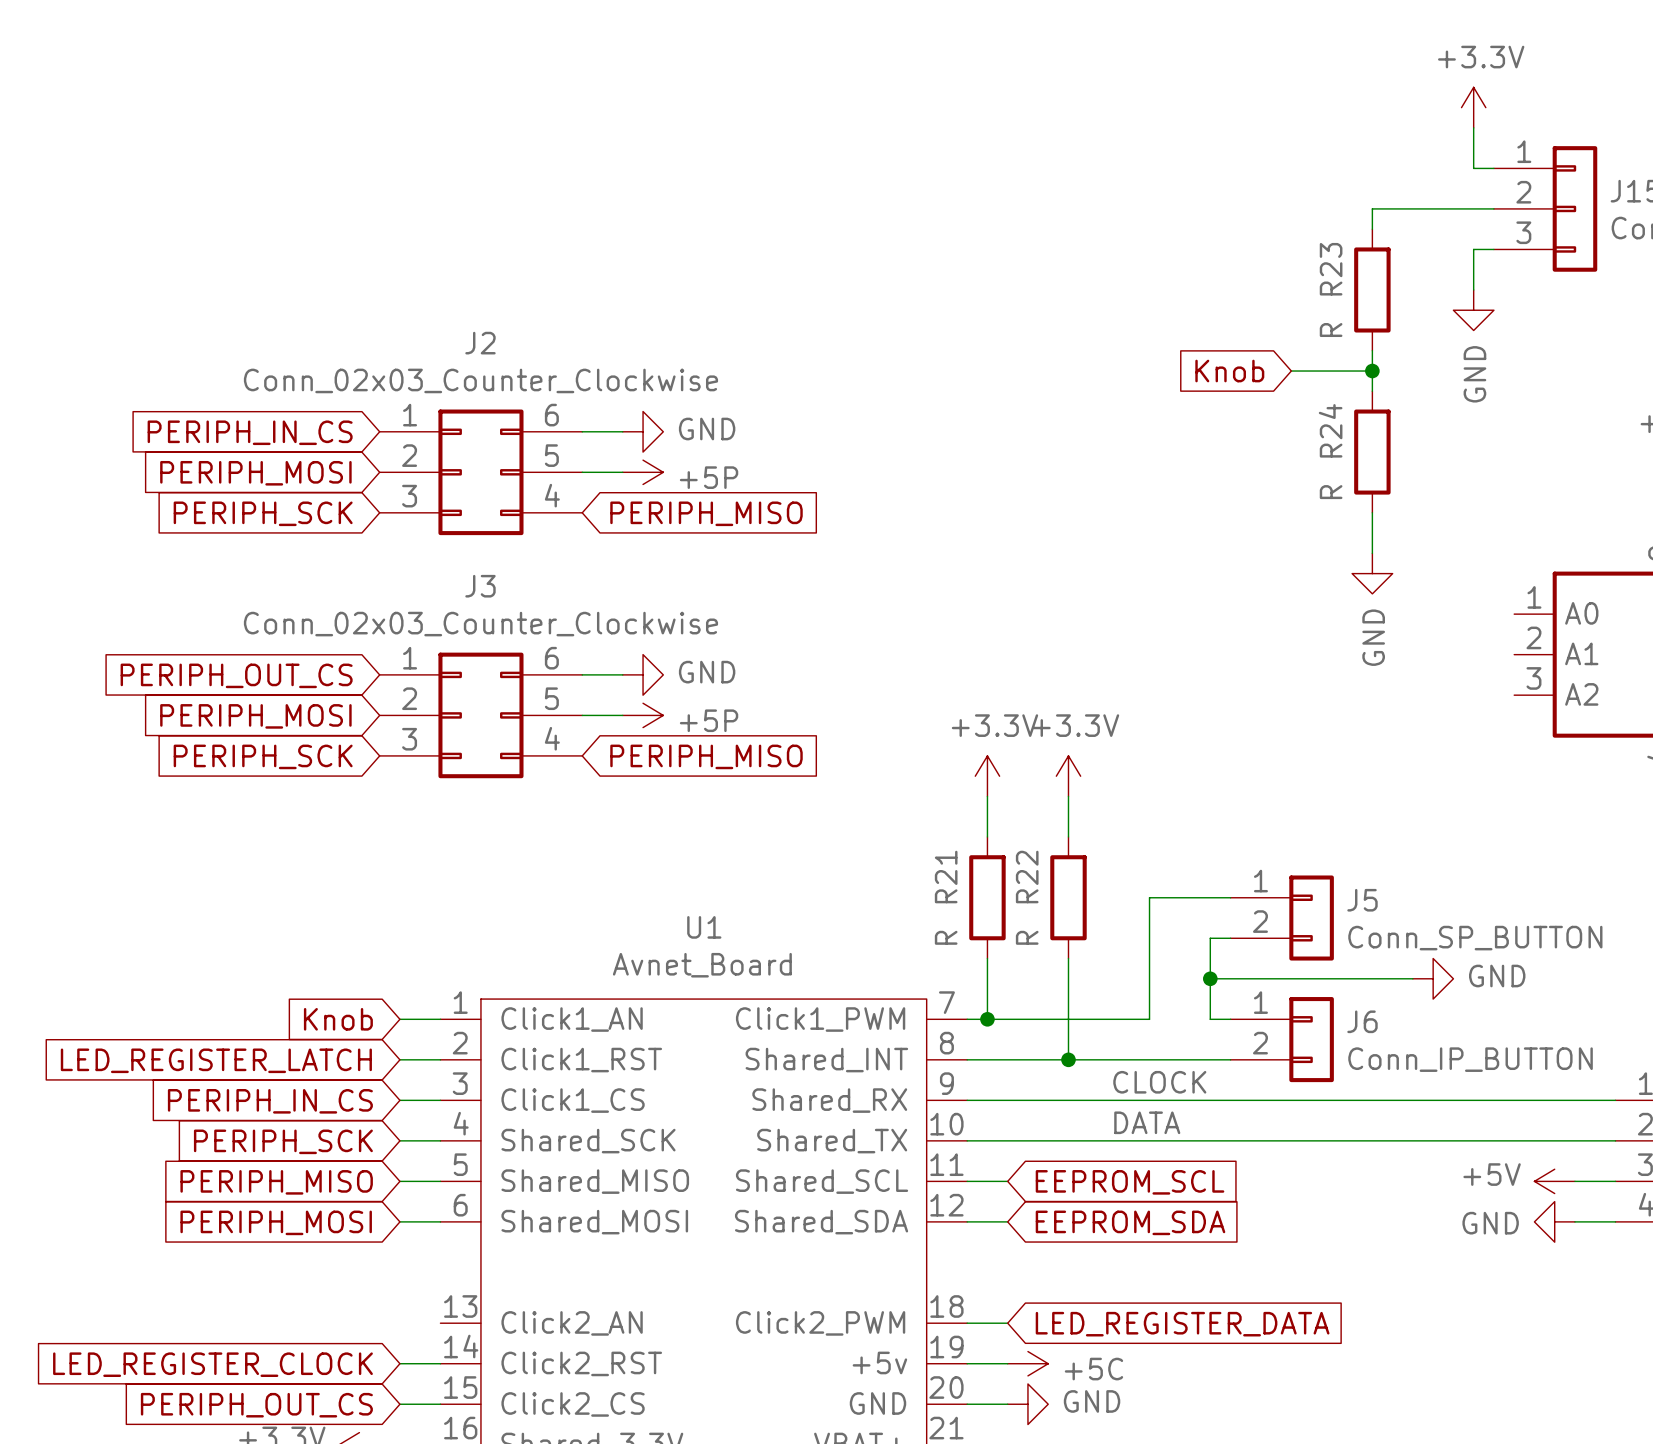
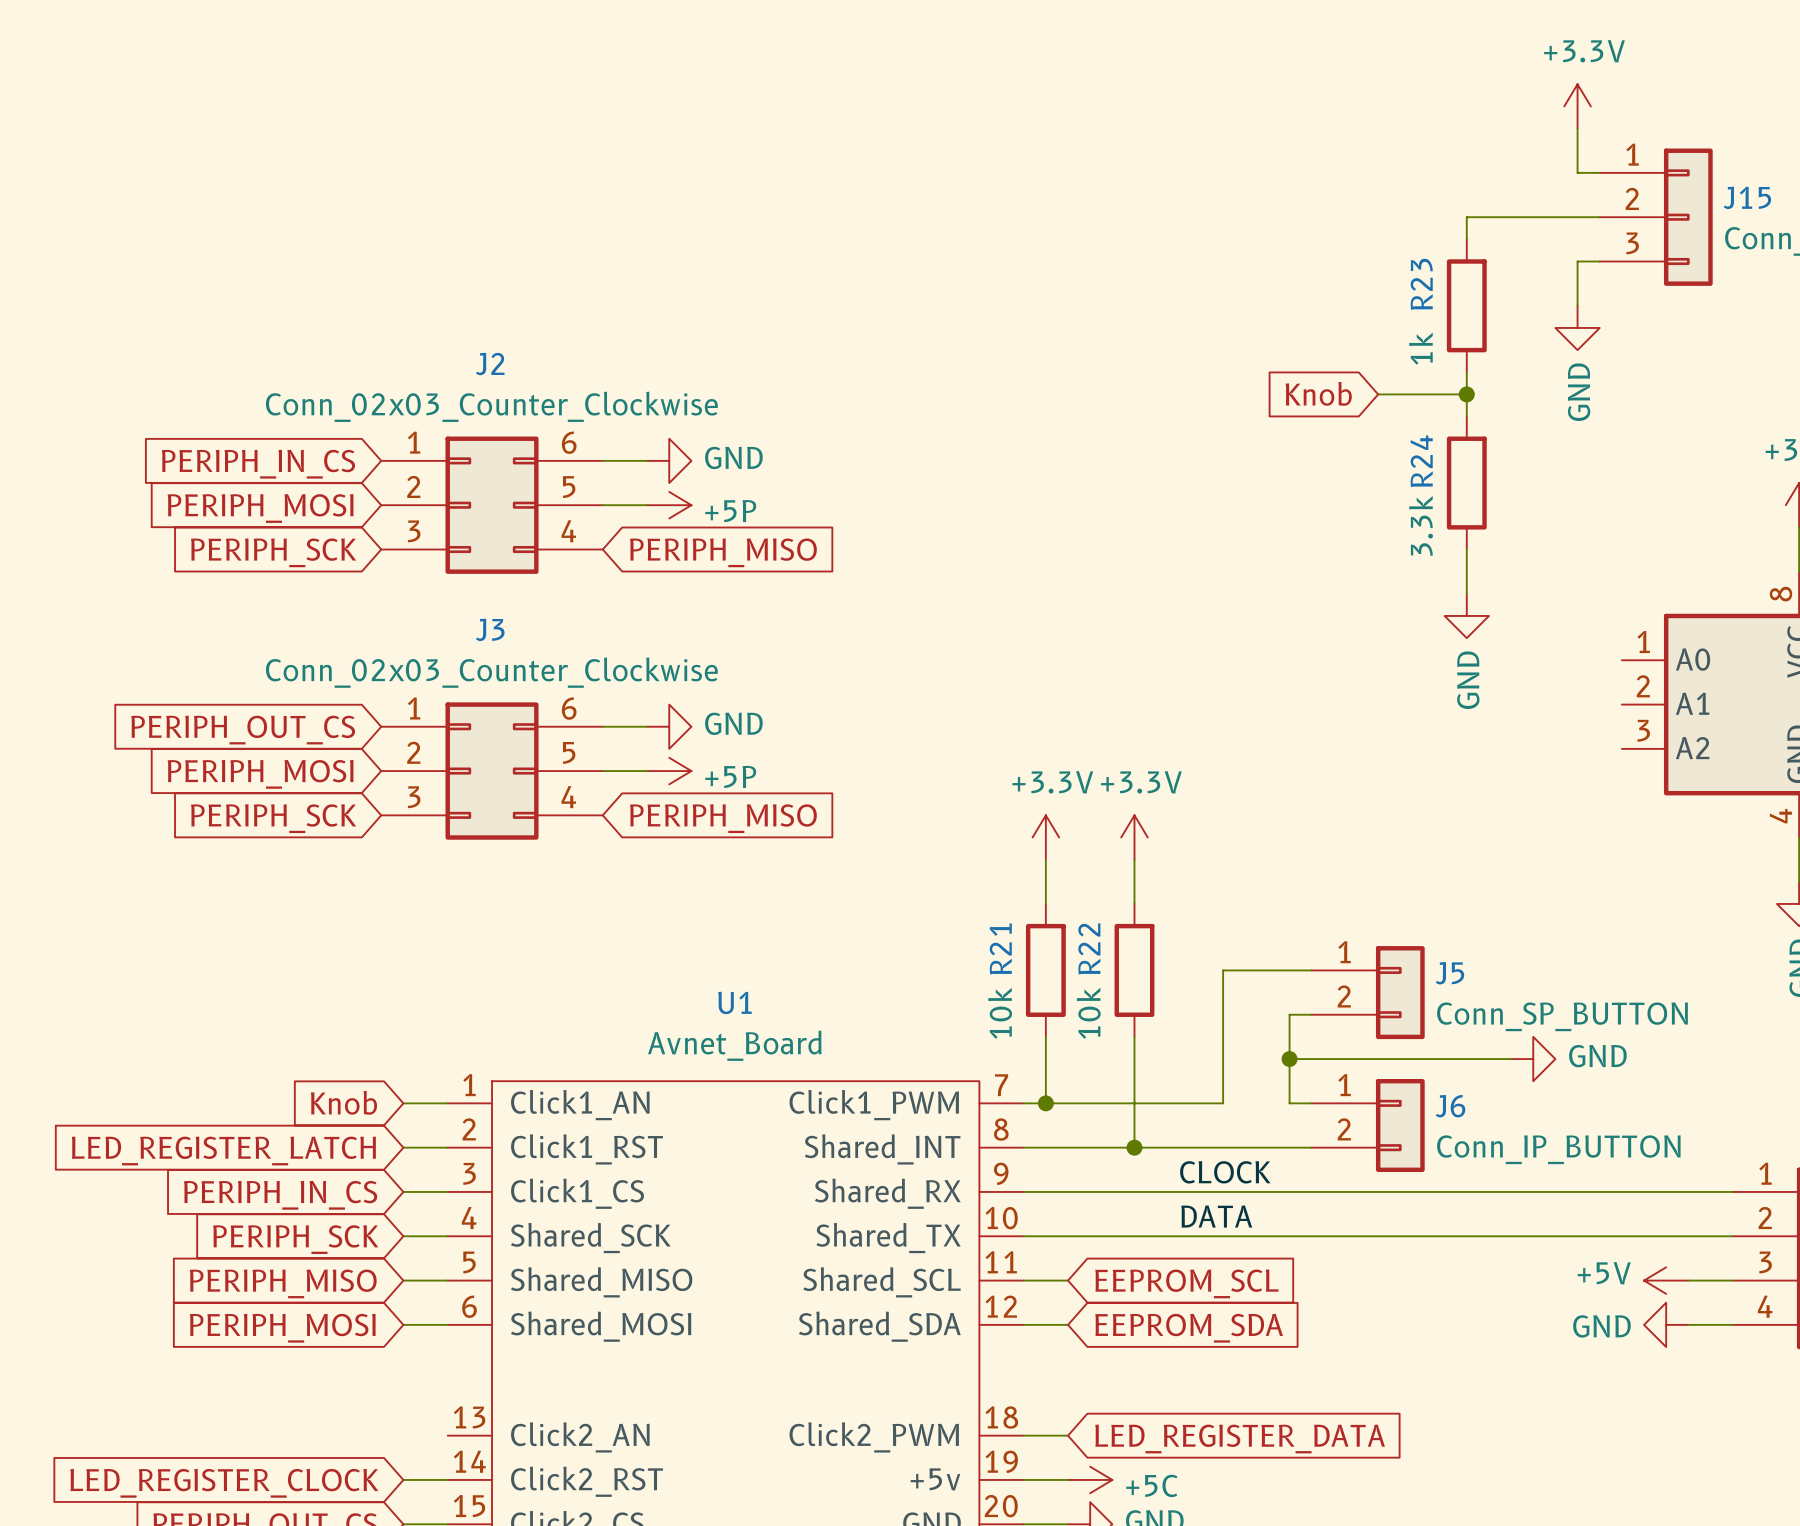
R23 value: R (1331, 330) -> 1k (1420, 348)
R24 value: R (1331, 492) -> 3.3k (1421, 525)
R21 value: R (946, 937) -> 10k (1000, 1013)
R22 value: R (1027, 937) -> 10k (1088, 1013)

